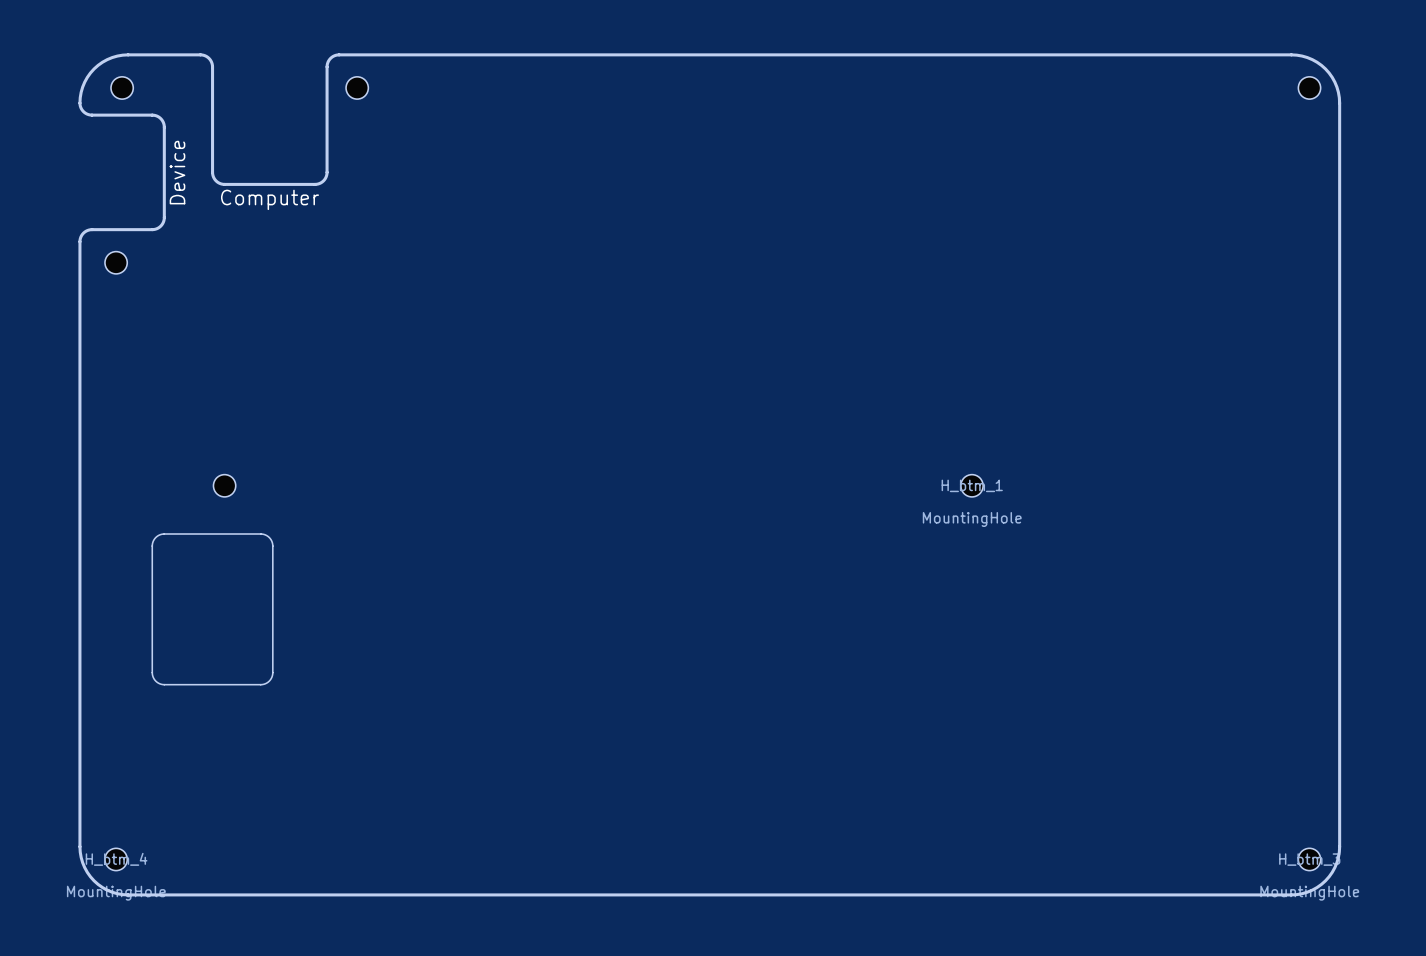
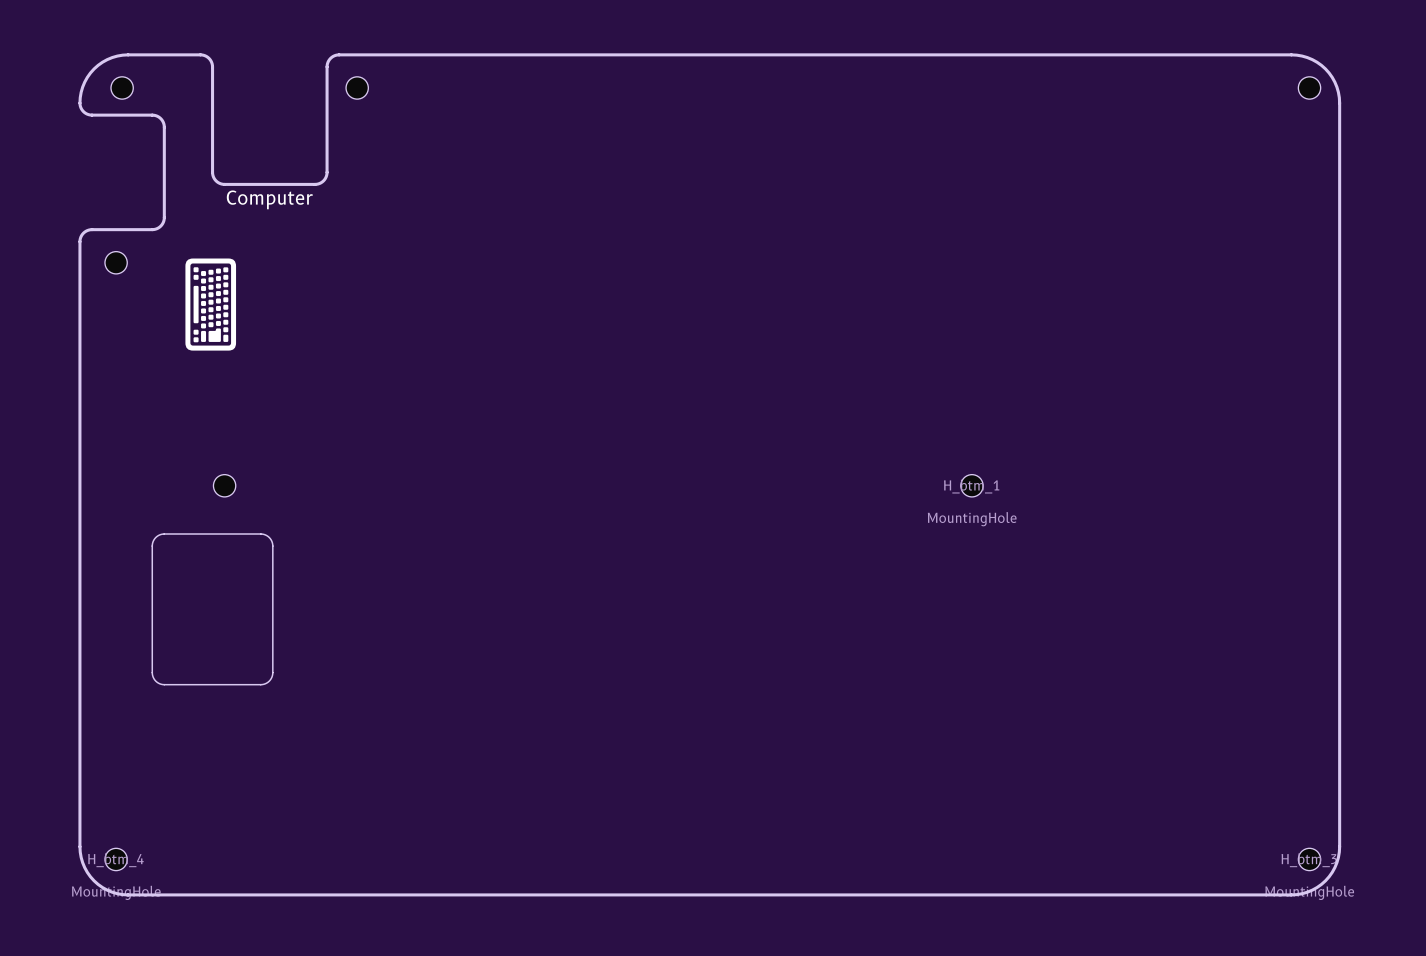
text: Device (177, 172) -> none
text: none -> ⌨️ (210, 304)

